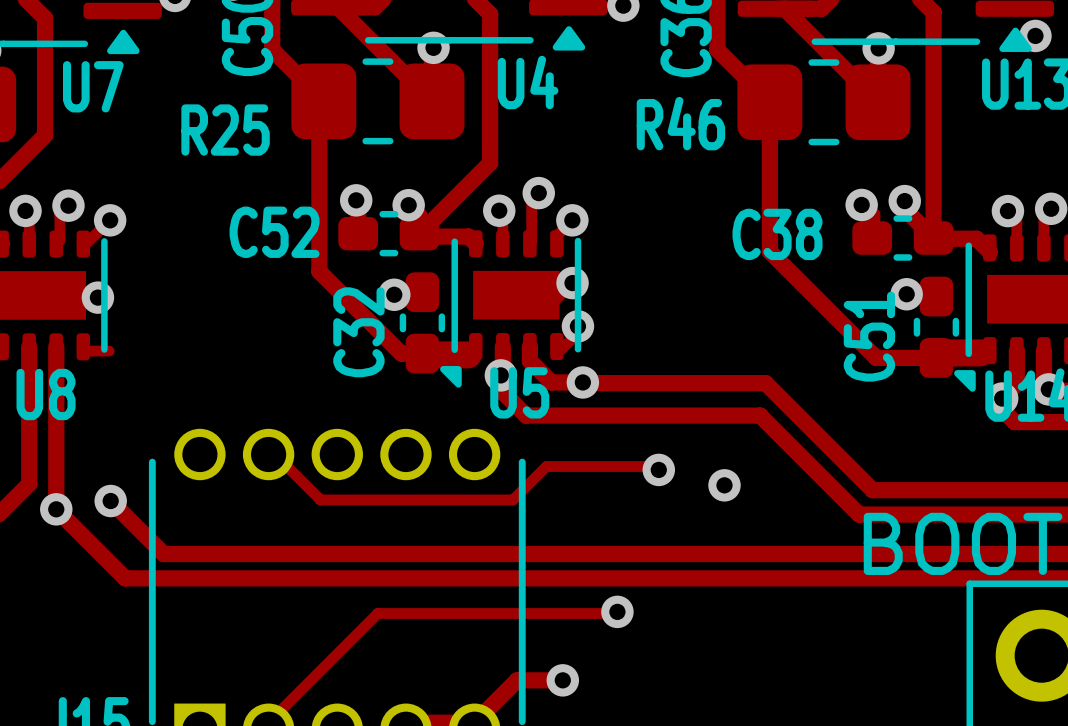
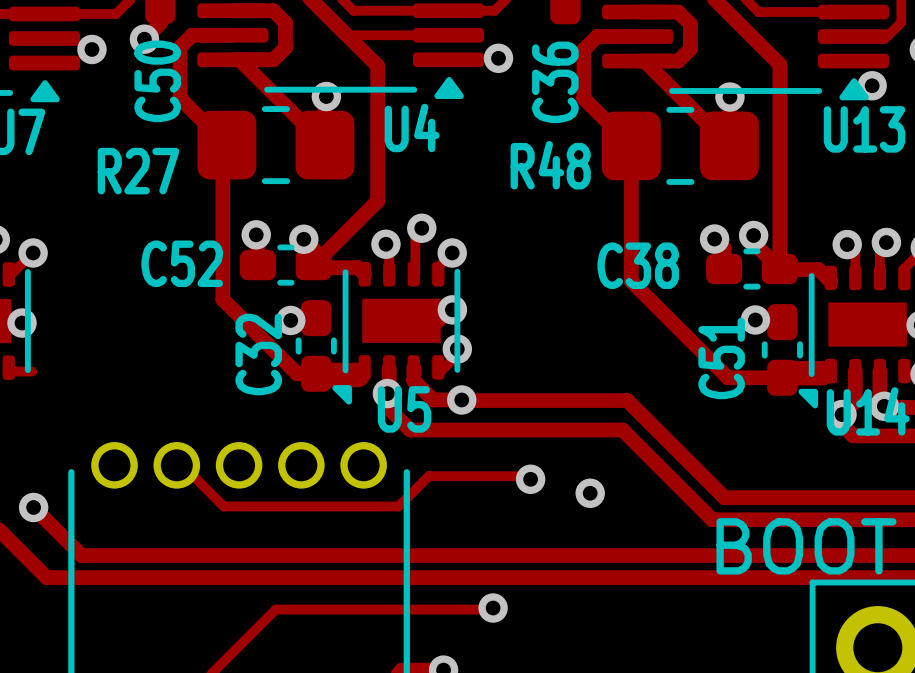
R46 name: R46 (680, 123) -> R48 (550, 165)
R25 name: R25 (225, 130) -> R27 (138, 171)

